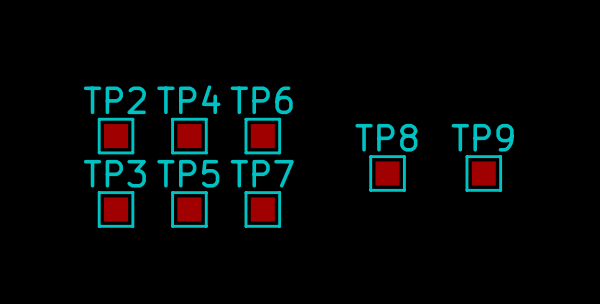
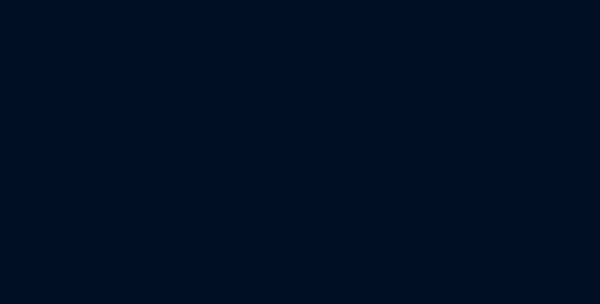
TP2: (116, 136) -> none
TP4: (189, 136) -> none
TP6: (262, 136) -> none
TP8: (387, 173) -> none
TP9: (483, 173) -> none
TP3: (116, 209) -> none
TP5: (189, 209) -> none
TP7: (262, 209) -> none

